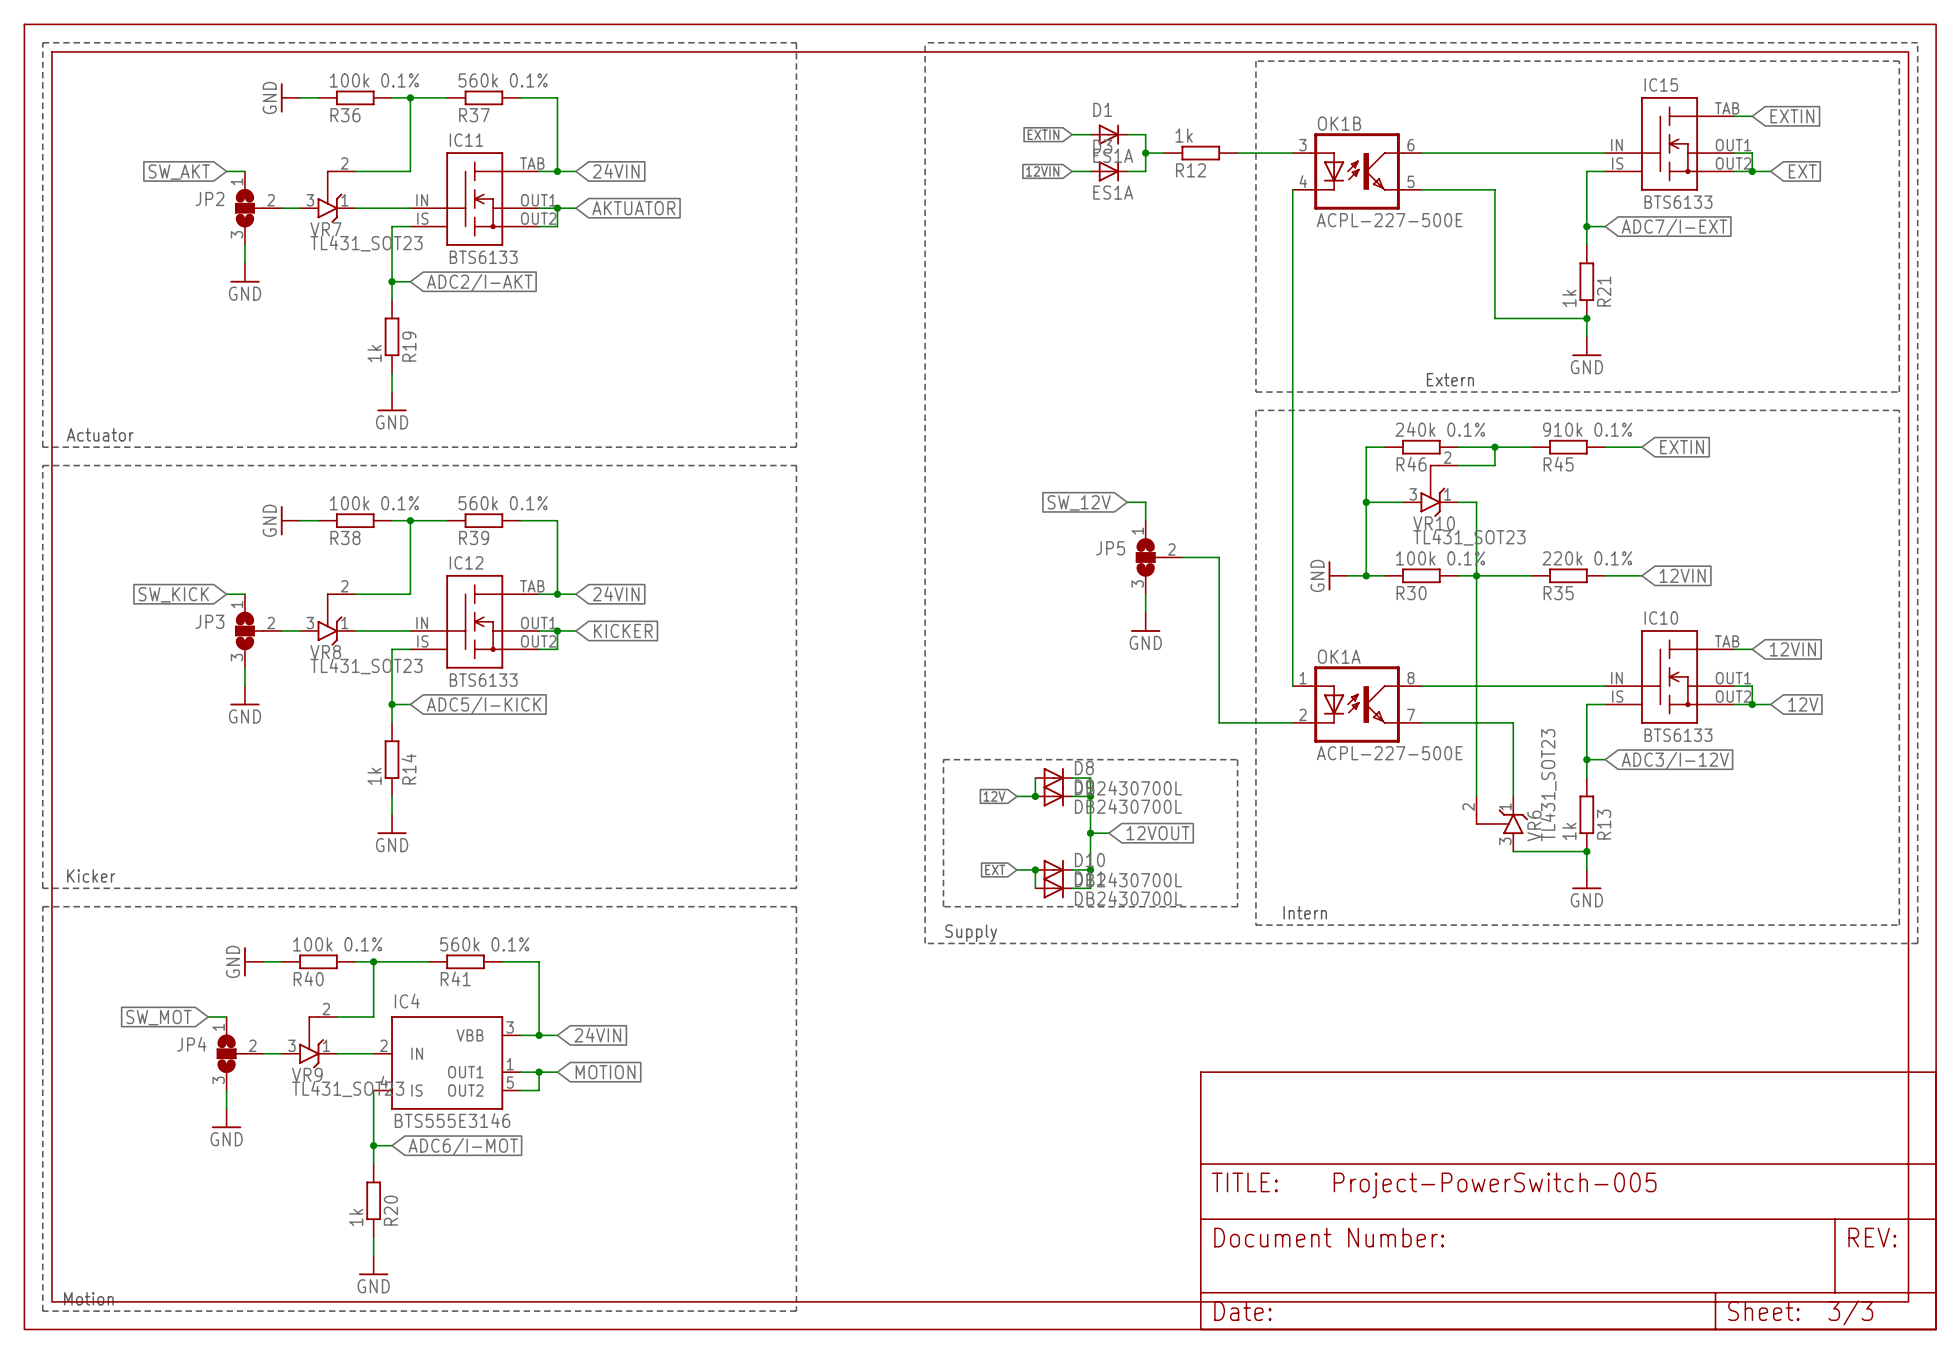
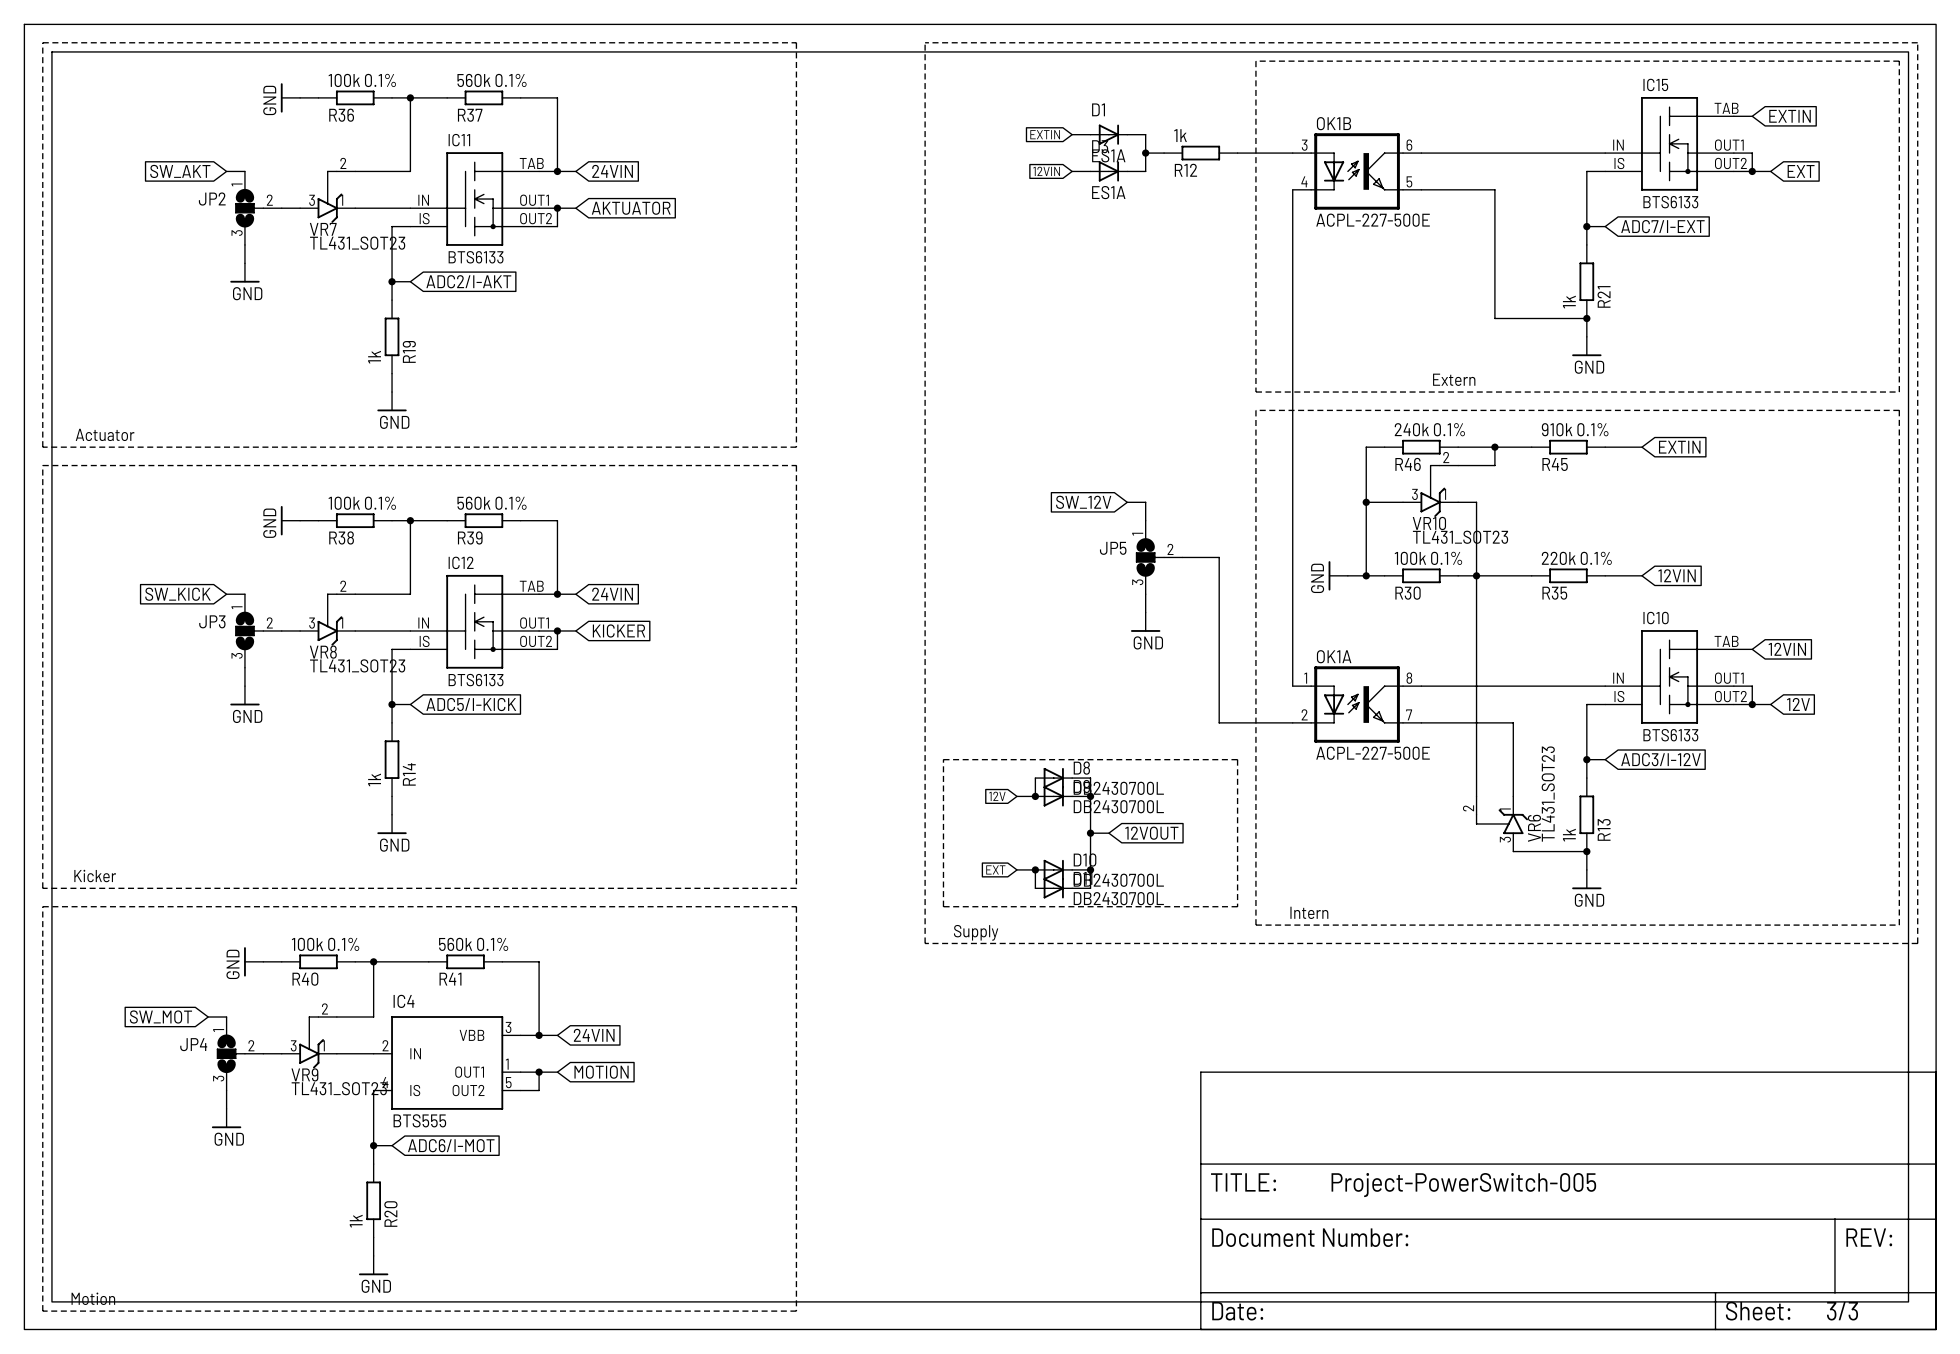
IC4 value: BTS555E3146 (452, 1120) -> BTS555 (419, 1120)

